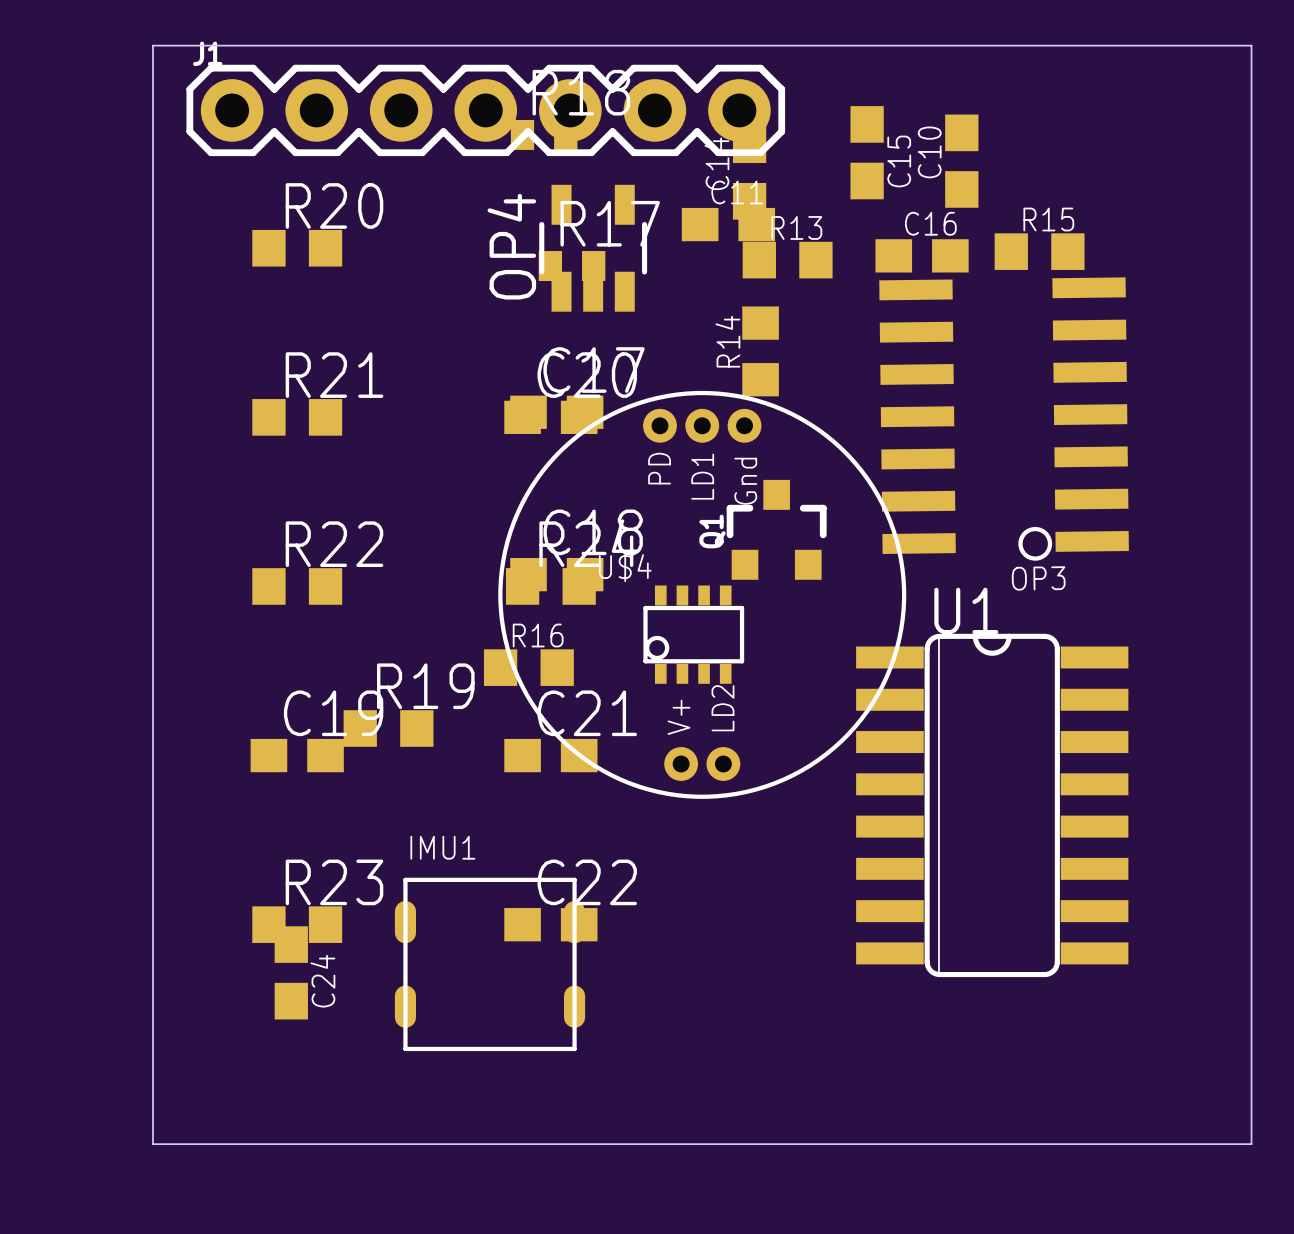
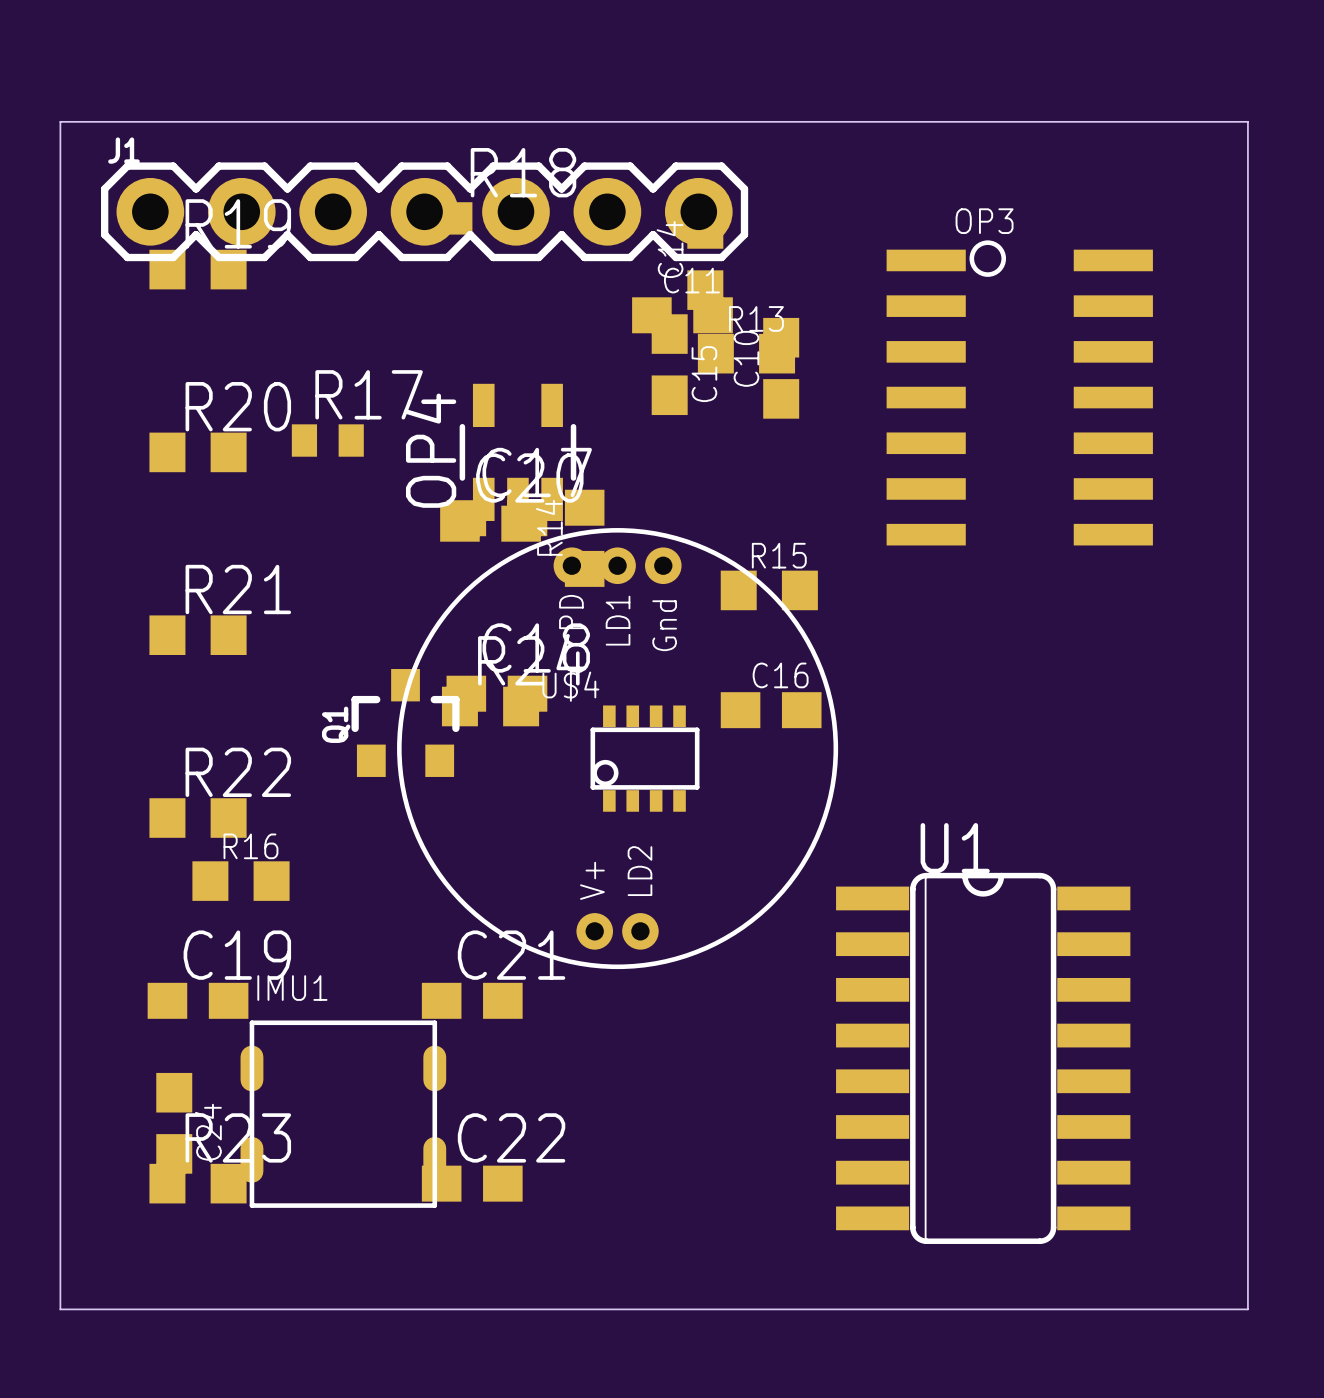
J1 position: (485, 110) -> (424, 211)
C15 position: (867, 152) -> (669, 364)
C10 position: (961, 161) -> (781, 368)
R20 position: (297, 248) -> (198, 452)
OP4 position: (593, 248) -> (517, 452)
R15 position: (1039, 251) -> (769, 590)
C16 position: (922, 255) -> (771, 710)
R17 position: (572, 266) -> (327, 440)
R14 position: (760, 351) -> (584, 538)
R21 position: (297, 417) -> (198, 635)
OP3 rotation: 0° (1004, 419) -> 179.3° counterclockwise (1019, 392)
Q1 position: (776, 529) -> (405, 722)
R22 position: (297, 586) -> (198, 818)
part position: (702, 594) -> (617, 748)
R16 position: (528, 667) -> (240, 881)
R19 position: (388, 728) -> (198, 269)
C19 position: (297, 755) -> (198, 1000)
C21 position: (550, 755) -> (472, 1000)
U1 position: (992, 805) -> (983, 1058)
R23 position: (297, 924) -> (198, 1183)
C22 position: (550, 924) -> (472, 1183)
IMU1 position: (490, 964) -> (343, 1114)
C24 position: (291, 972) -> (174, 1123)

